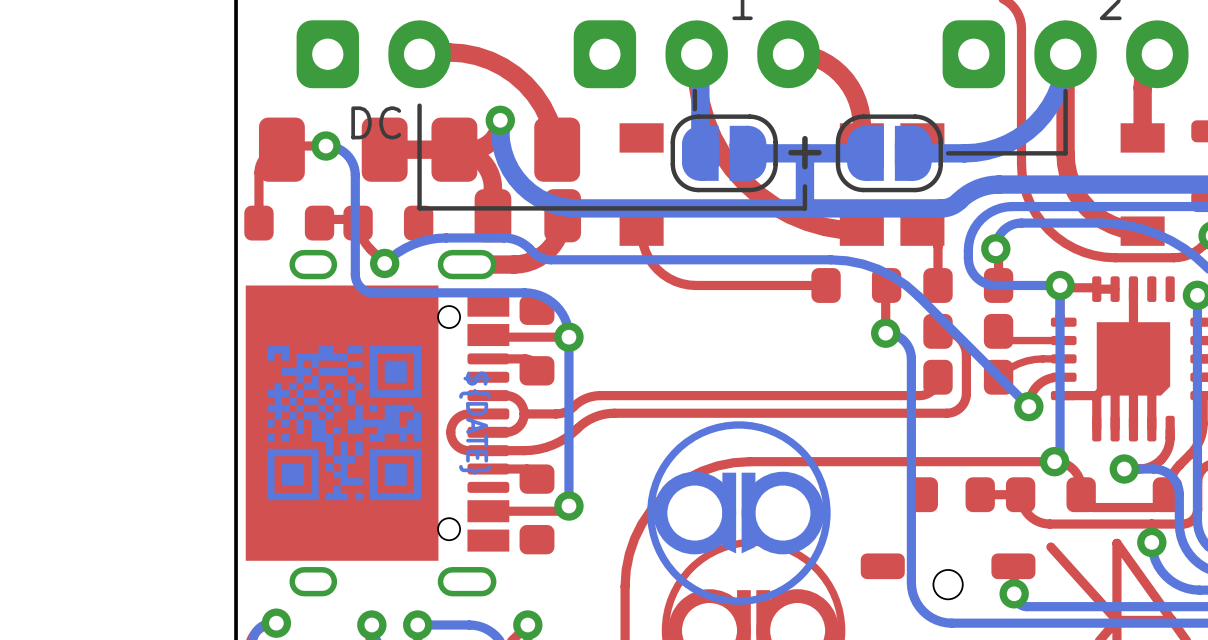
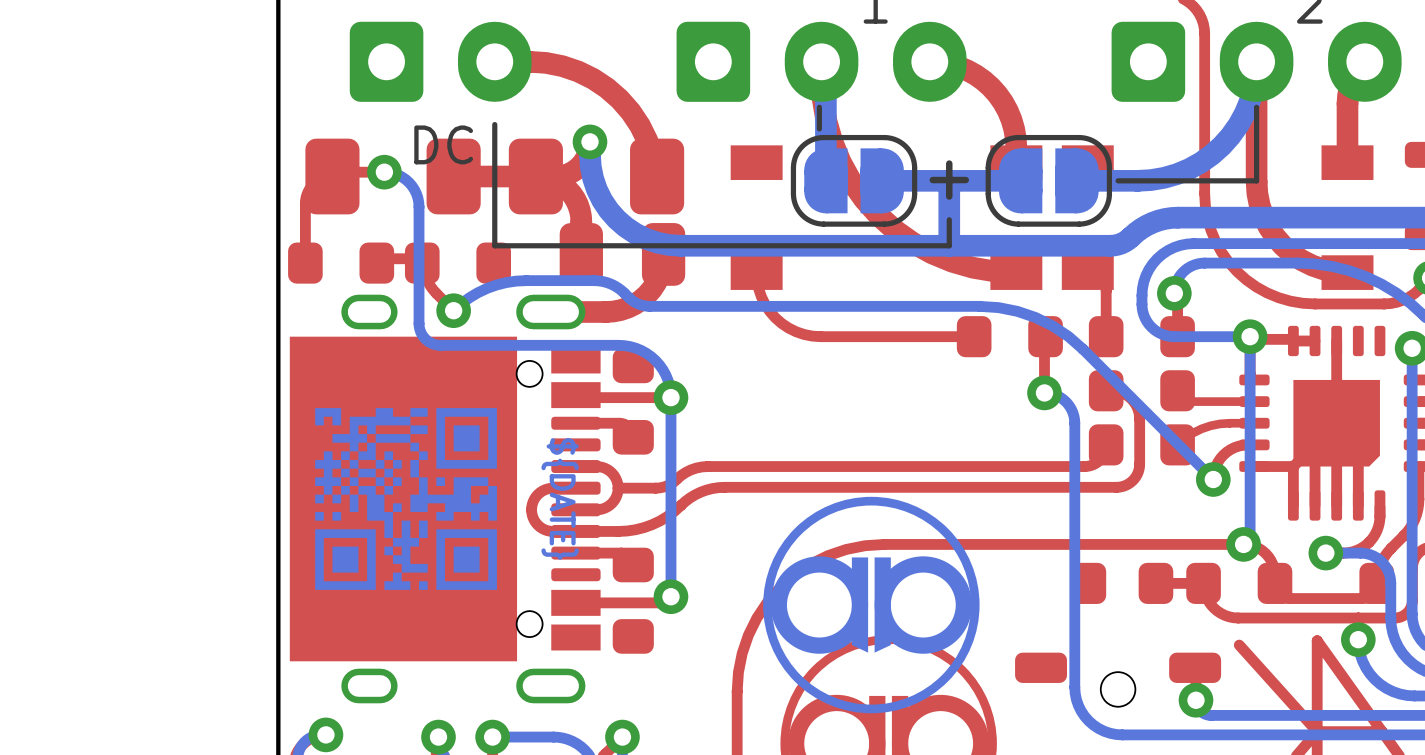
part footprint: [296, 20, 451, 89] -> [349, 21, 532, 102]
part footprint: [573, 20, 820, 89] -> [676, 21, 967, 102]
part footprint: [942, 20, 1189, 89] -> [1111, 21, 1402, 102]

